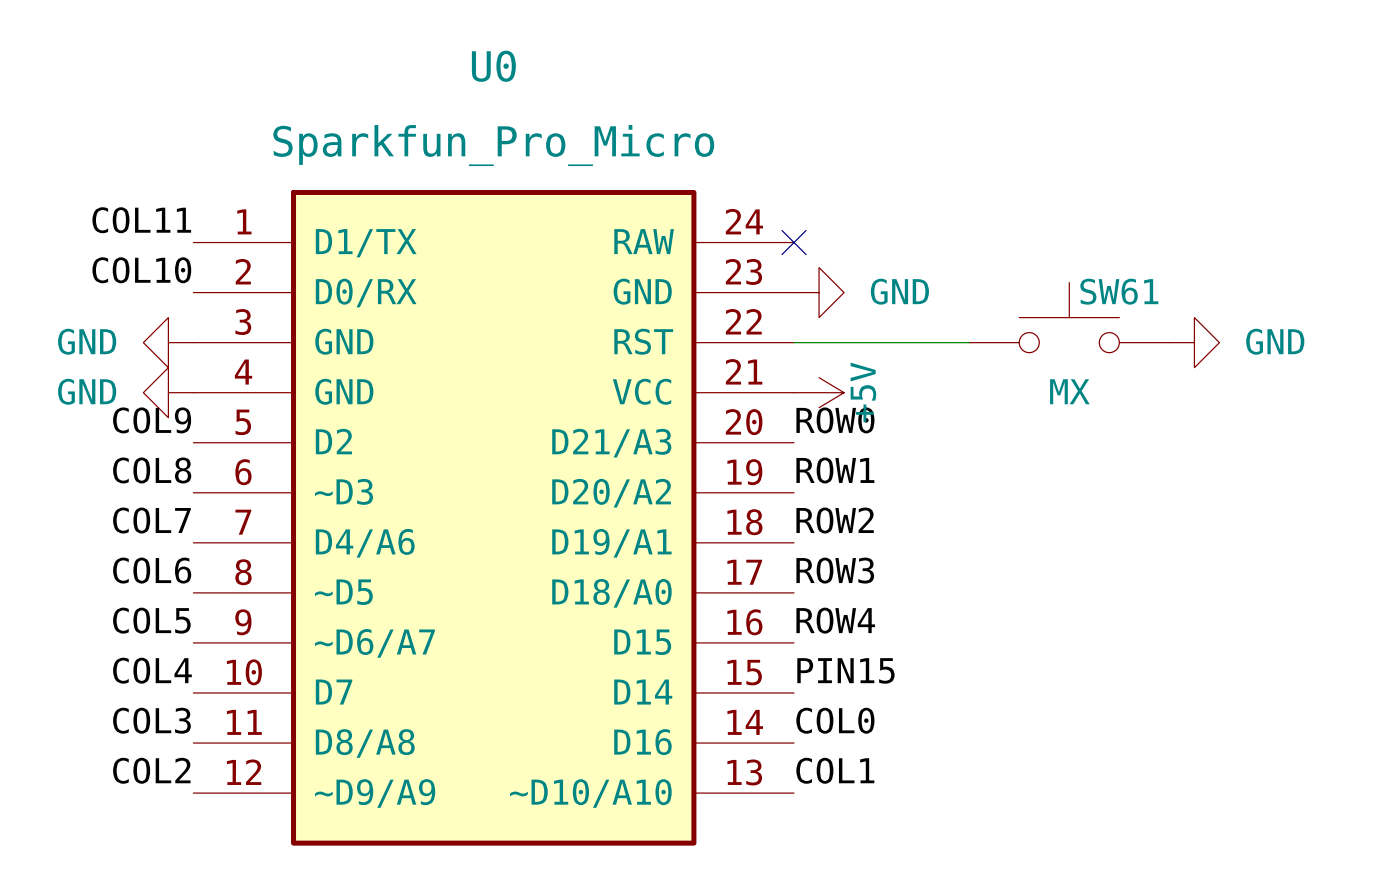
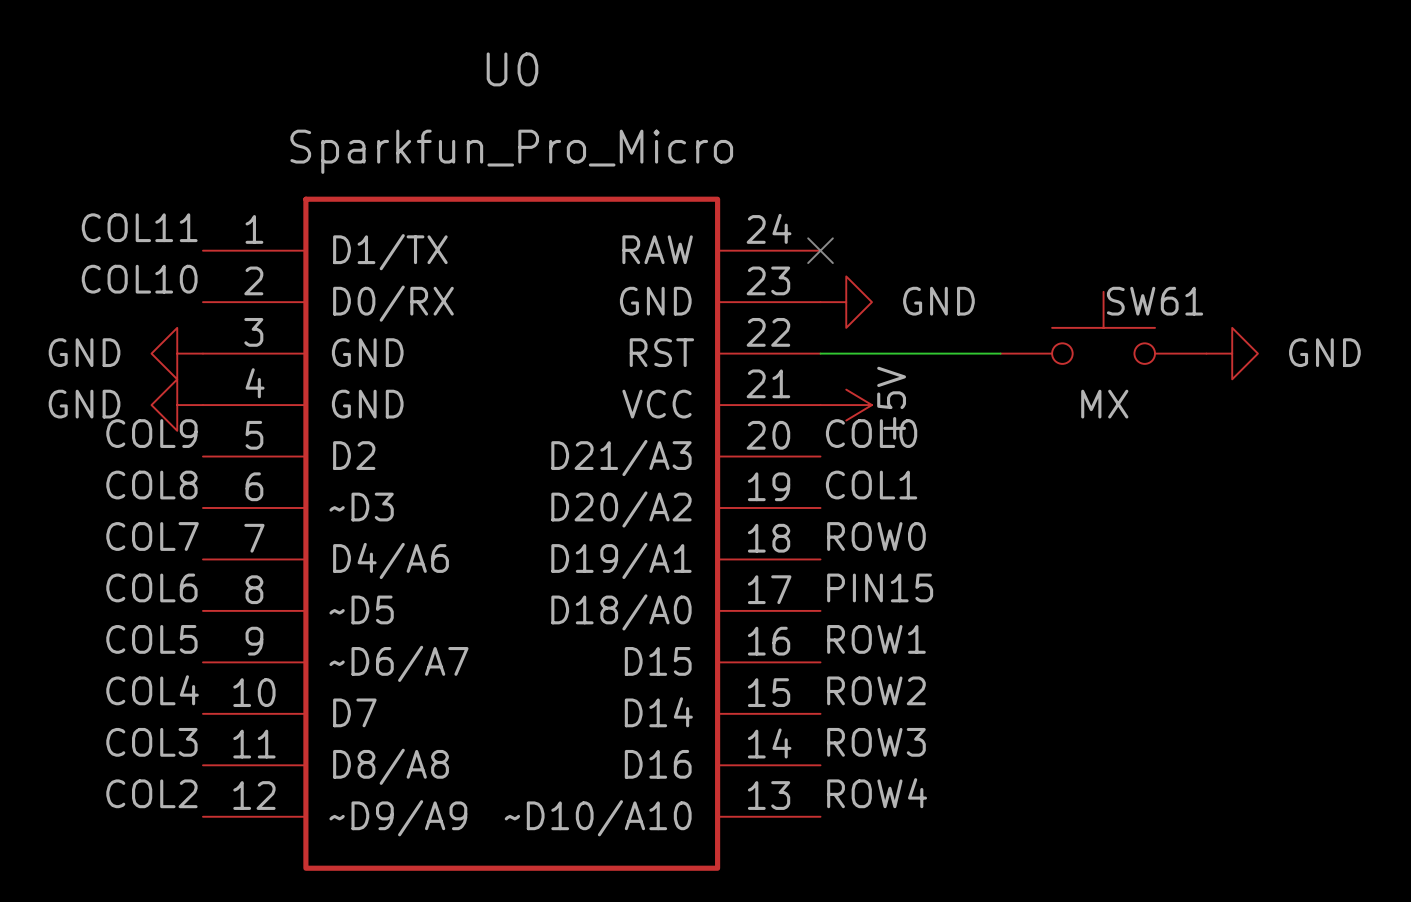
label: ROW0 (835, 420) -> COL0 (871, 433)
label: ROW1 (835, 470) -> COL1 (871, 485)
label: ROW2 (835, 520) -> ROW0 (876, 536)
label: ROW3 (835, 570) -> PIN15 (880, 587)
label: ROW4 (835, 620) -> ROW1 (876, 639)
label: PIN15 (845, 670) -> ROW2 (876, 690)
label: COL0 (835, 720) -> ROW3 (876, 742)
label: COL1 (835, 770) -> ROW4 (877, 793)

